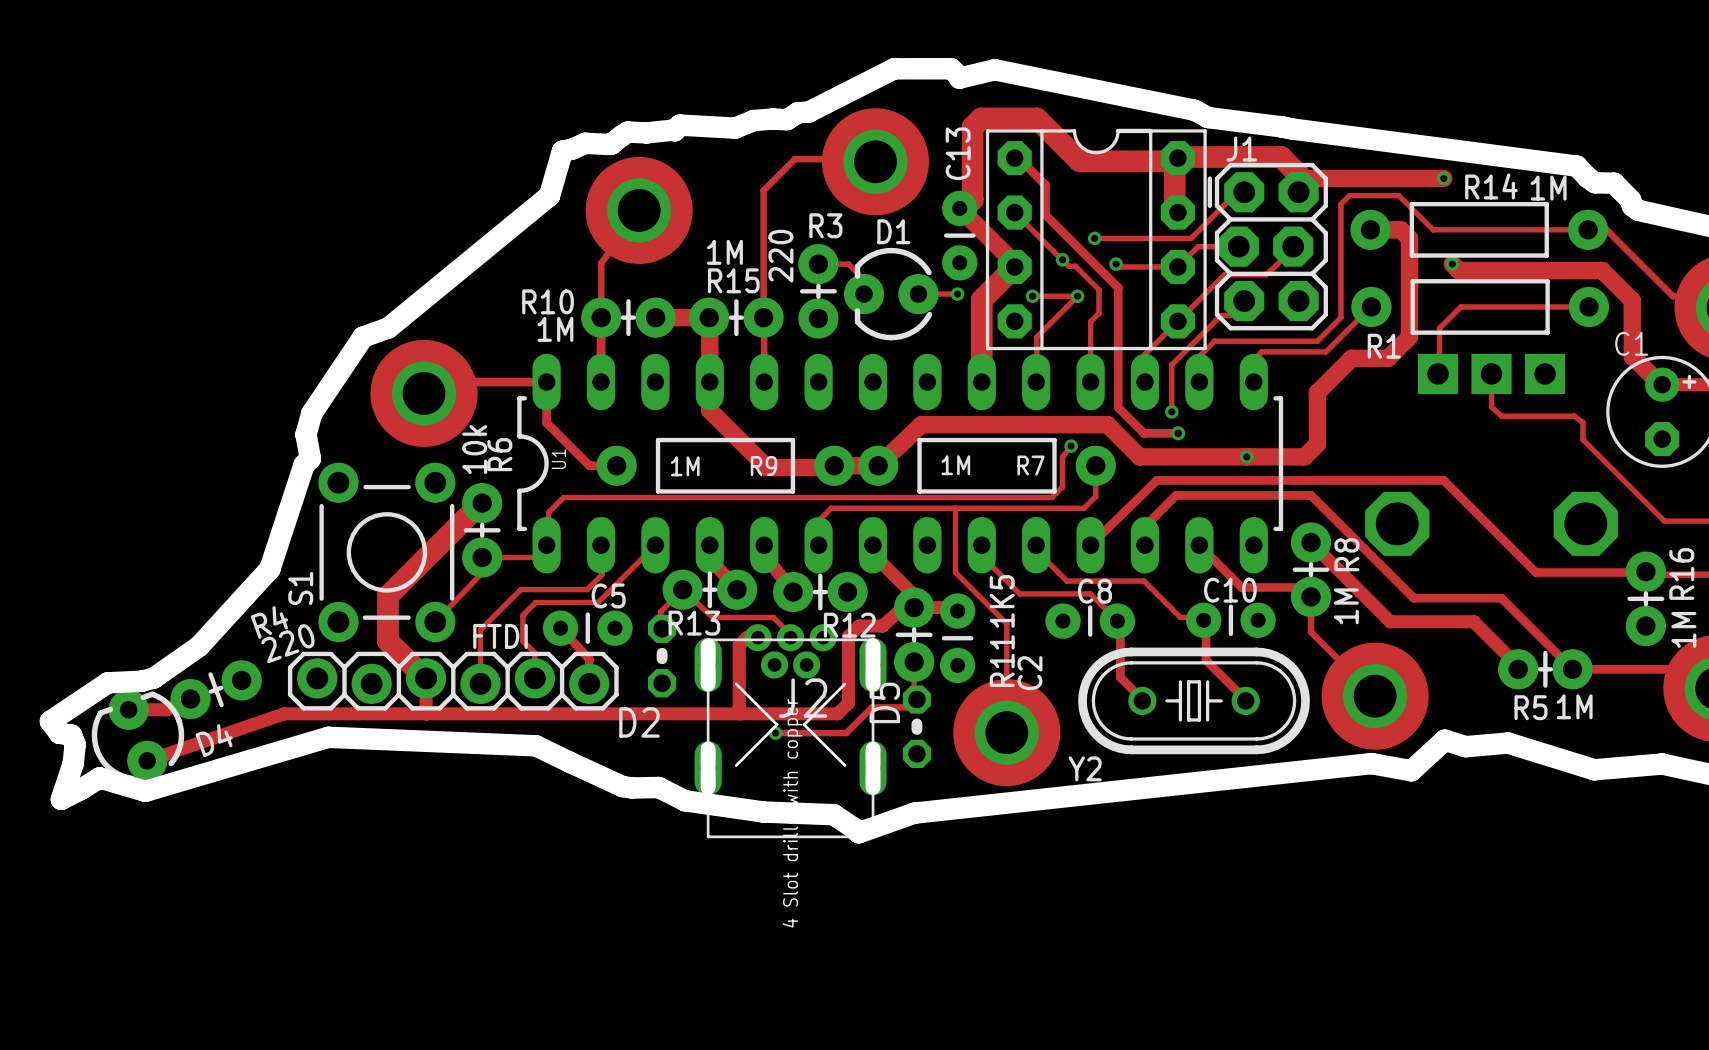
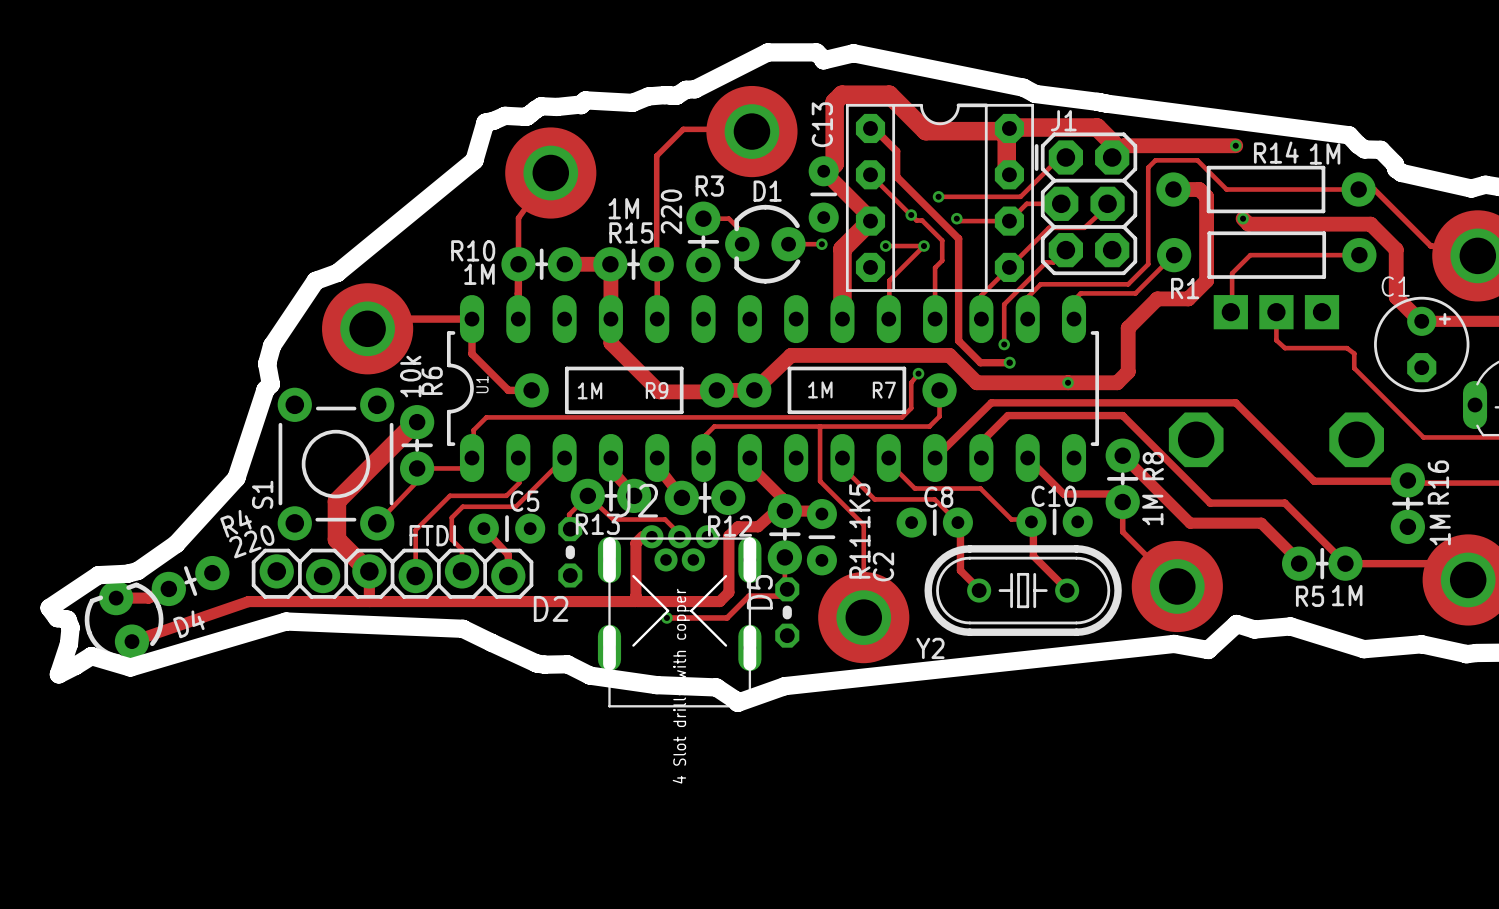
J2 name position: J2 (803, 698) -> J2 (637, 500)

